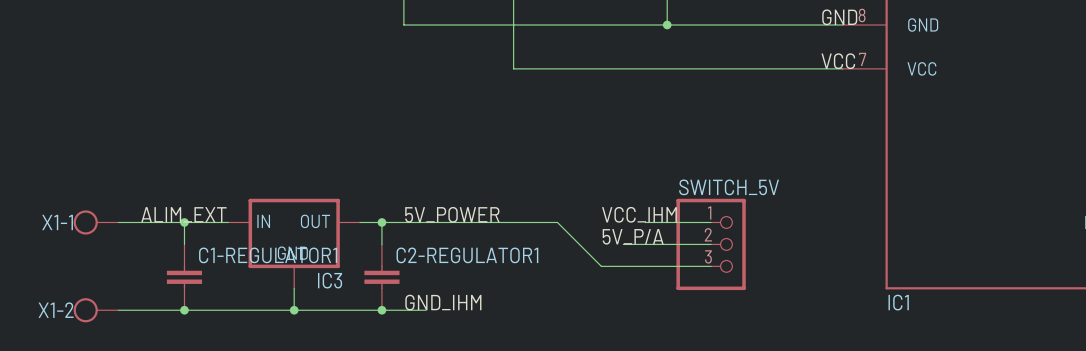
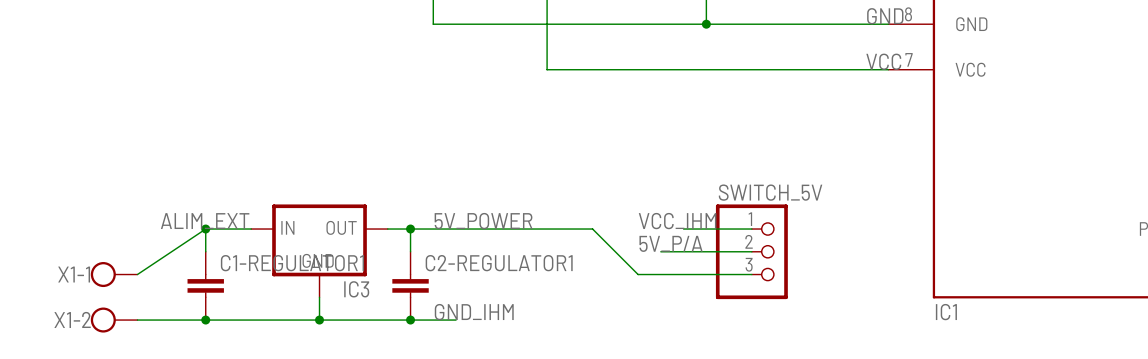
X1-1 position: (96, 222) -> (114, 274)
wire: (118, 222) (184, 222) -> (137, 274) (205, 229)

